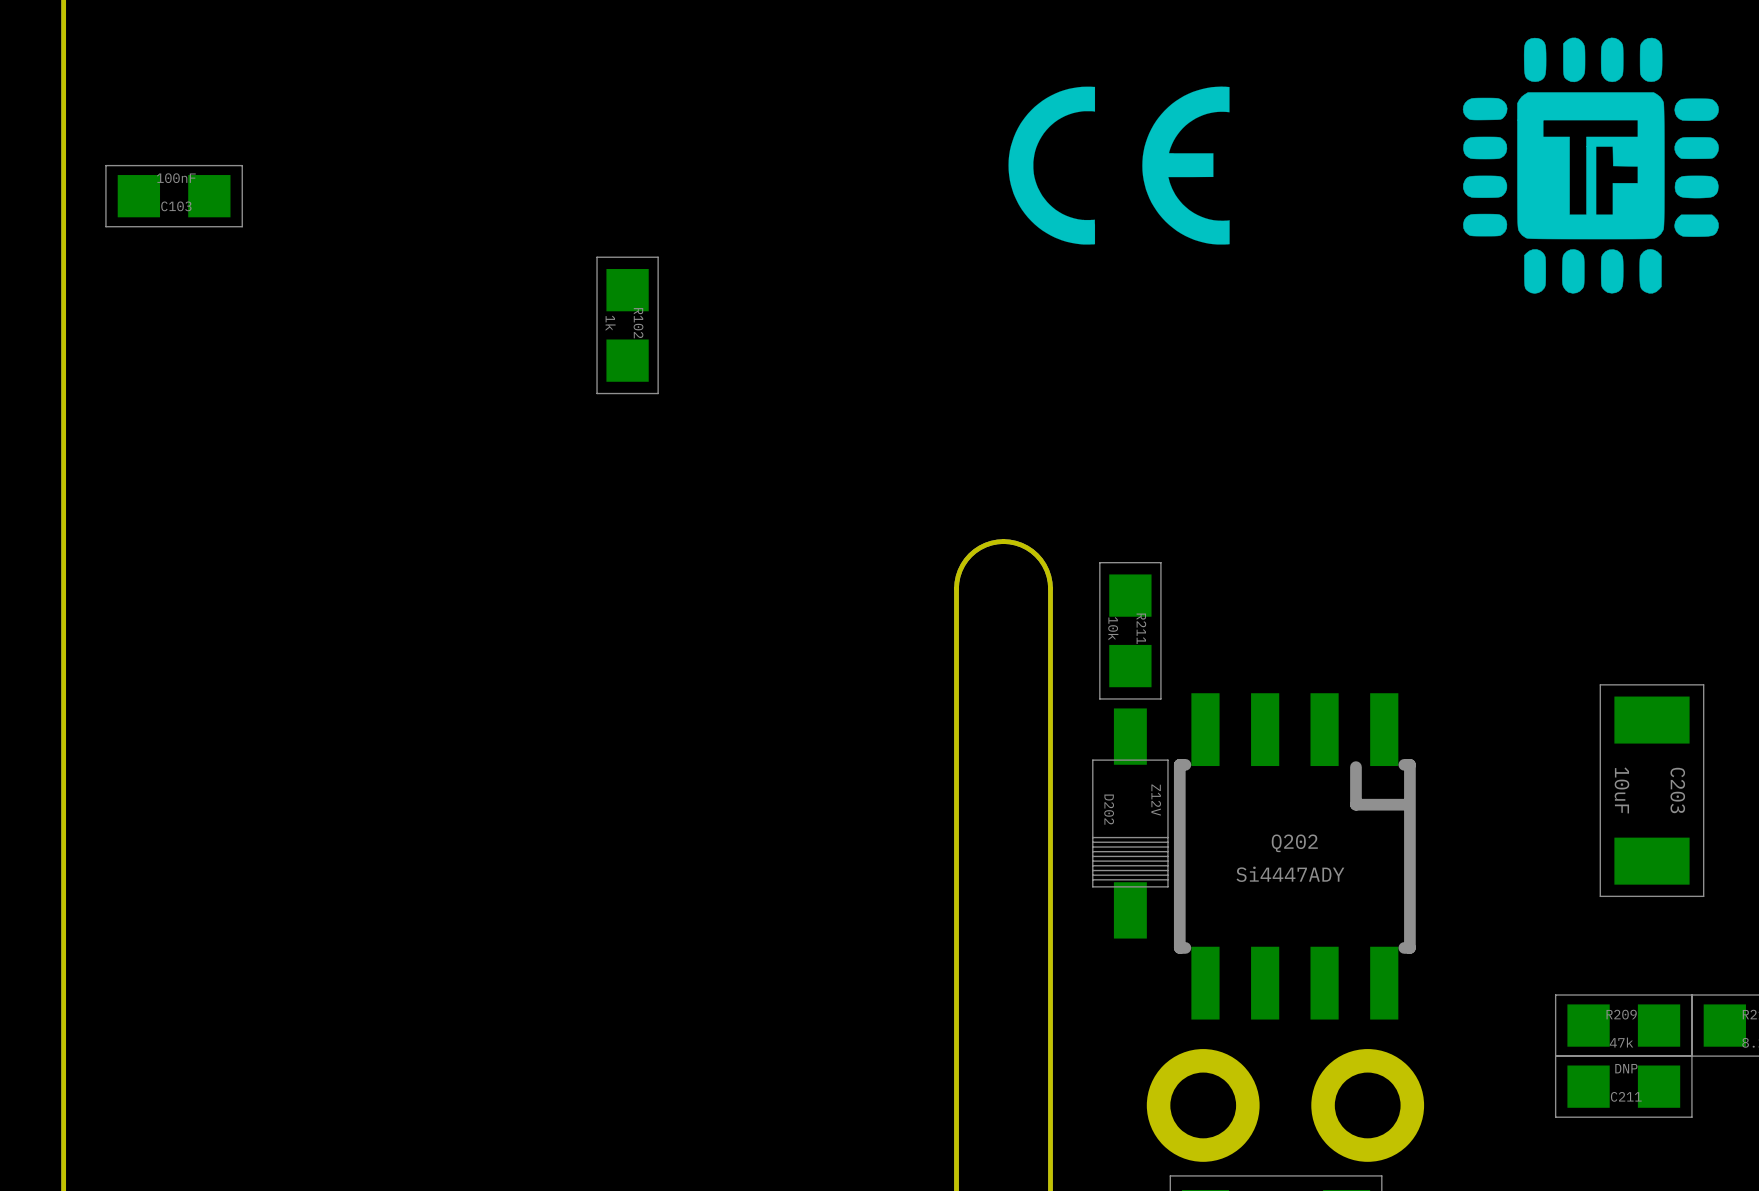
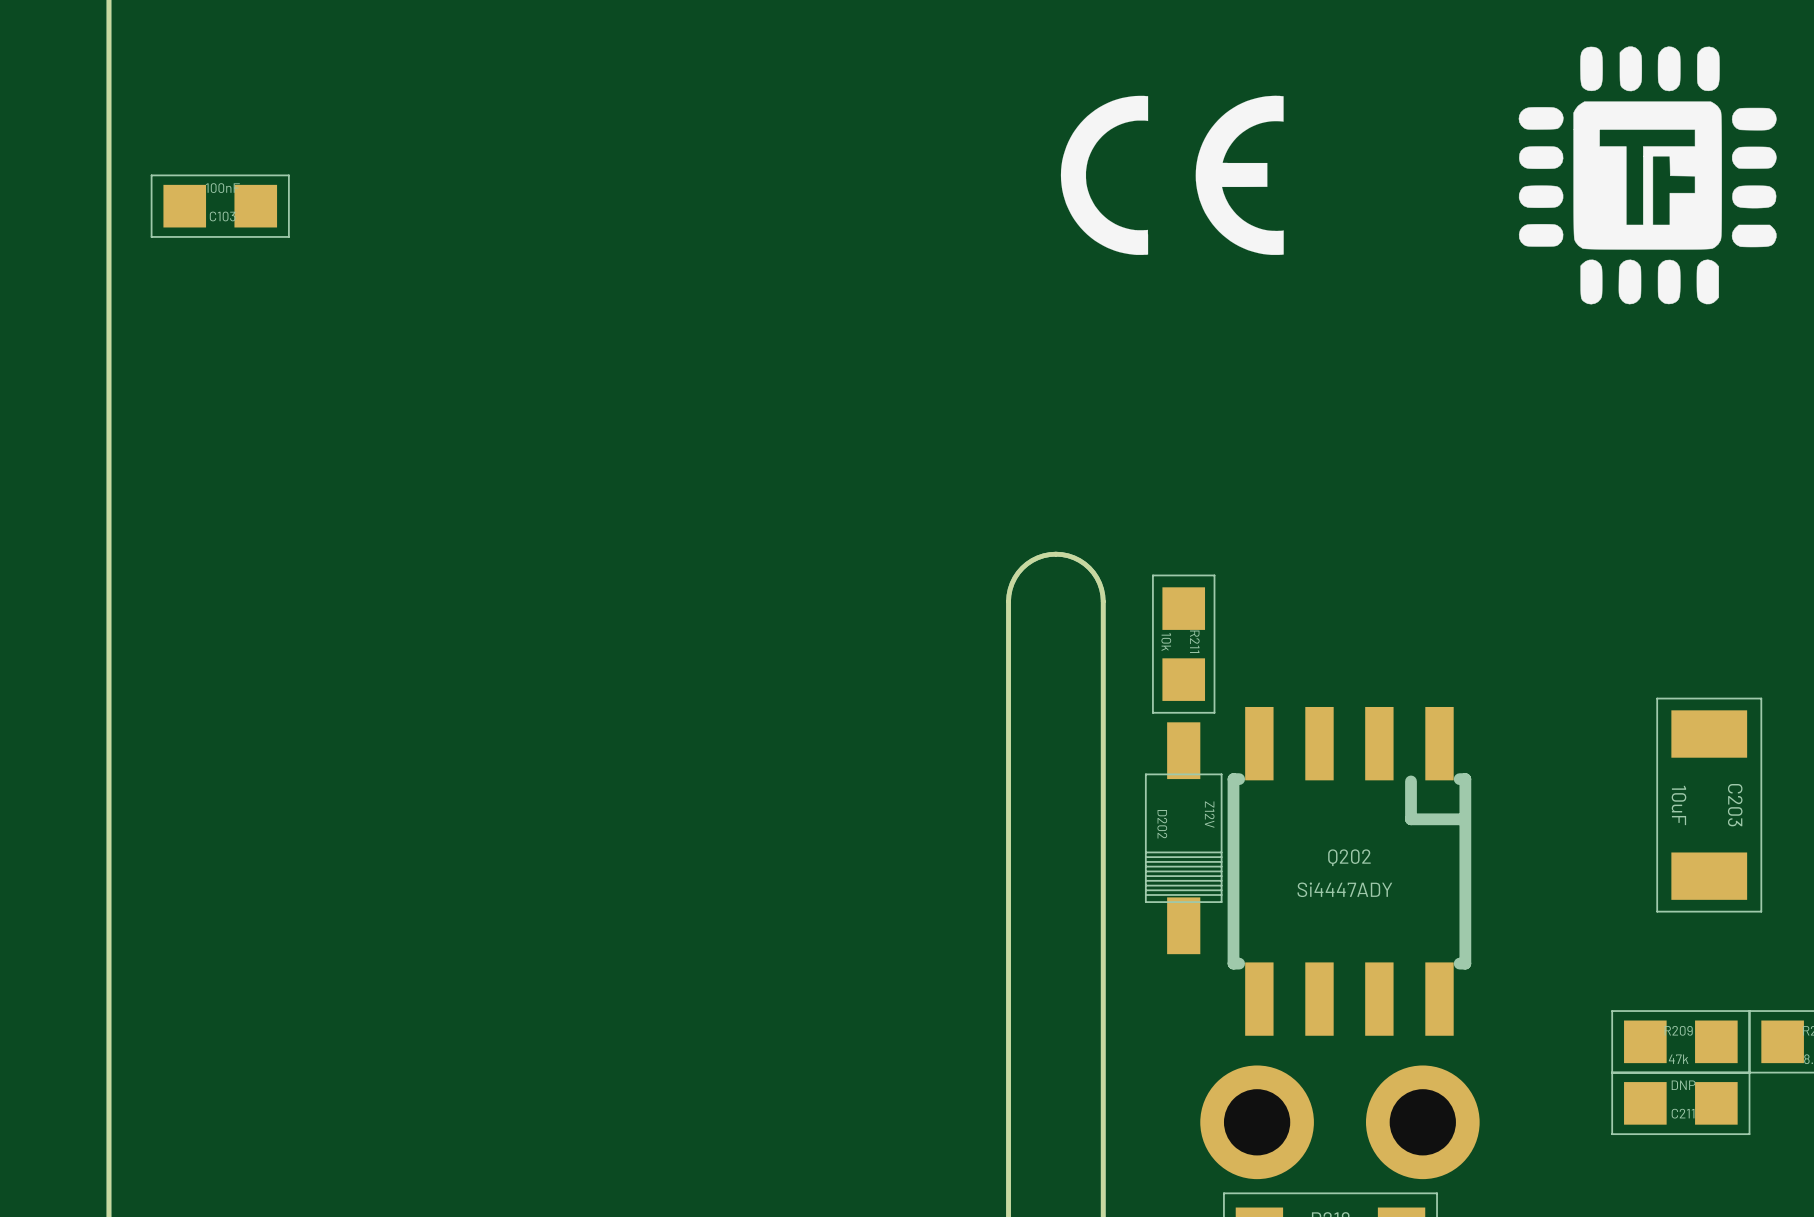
R102: 1k (627, 325) -> none

